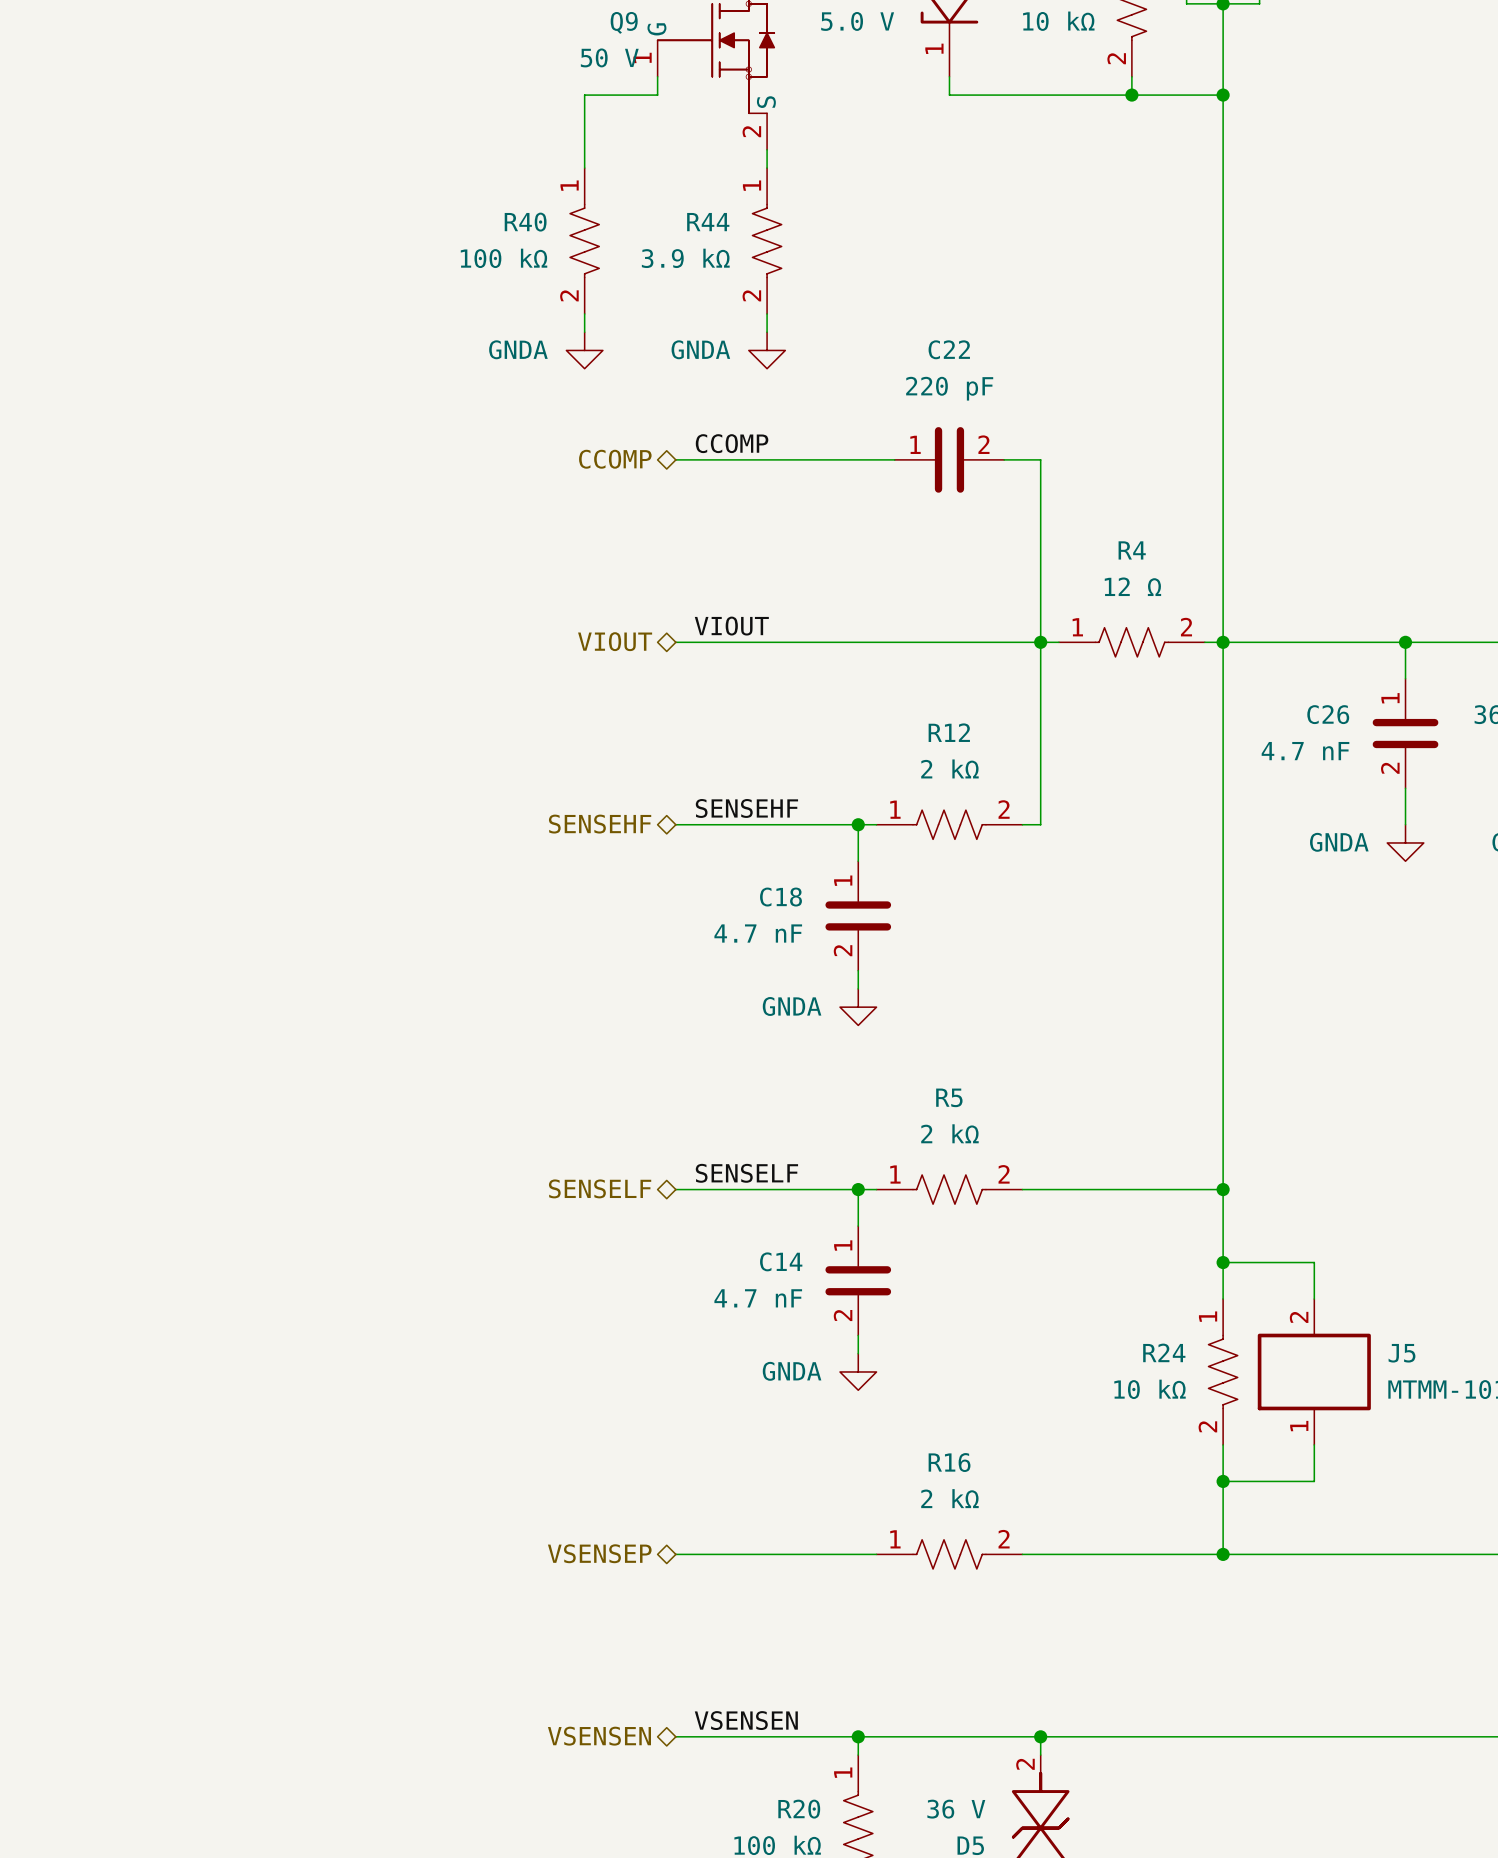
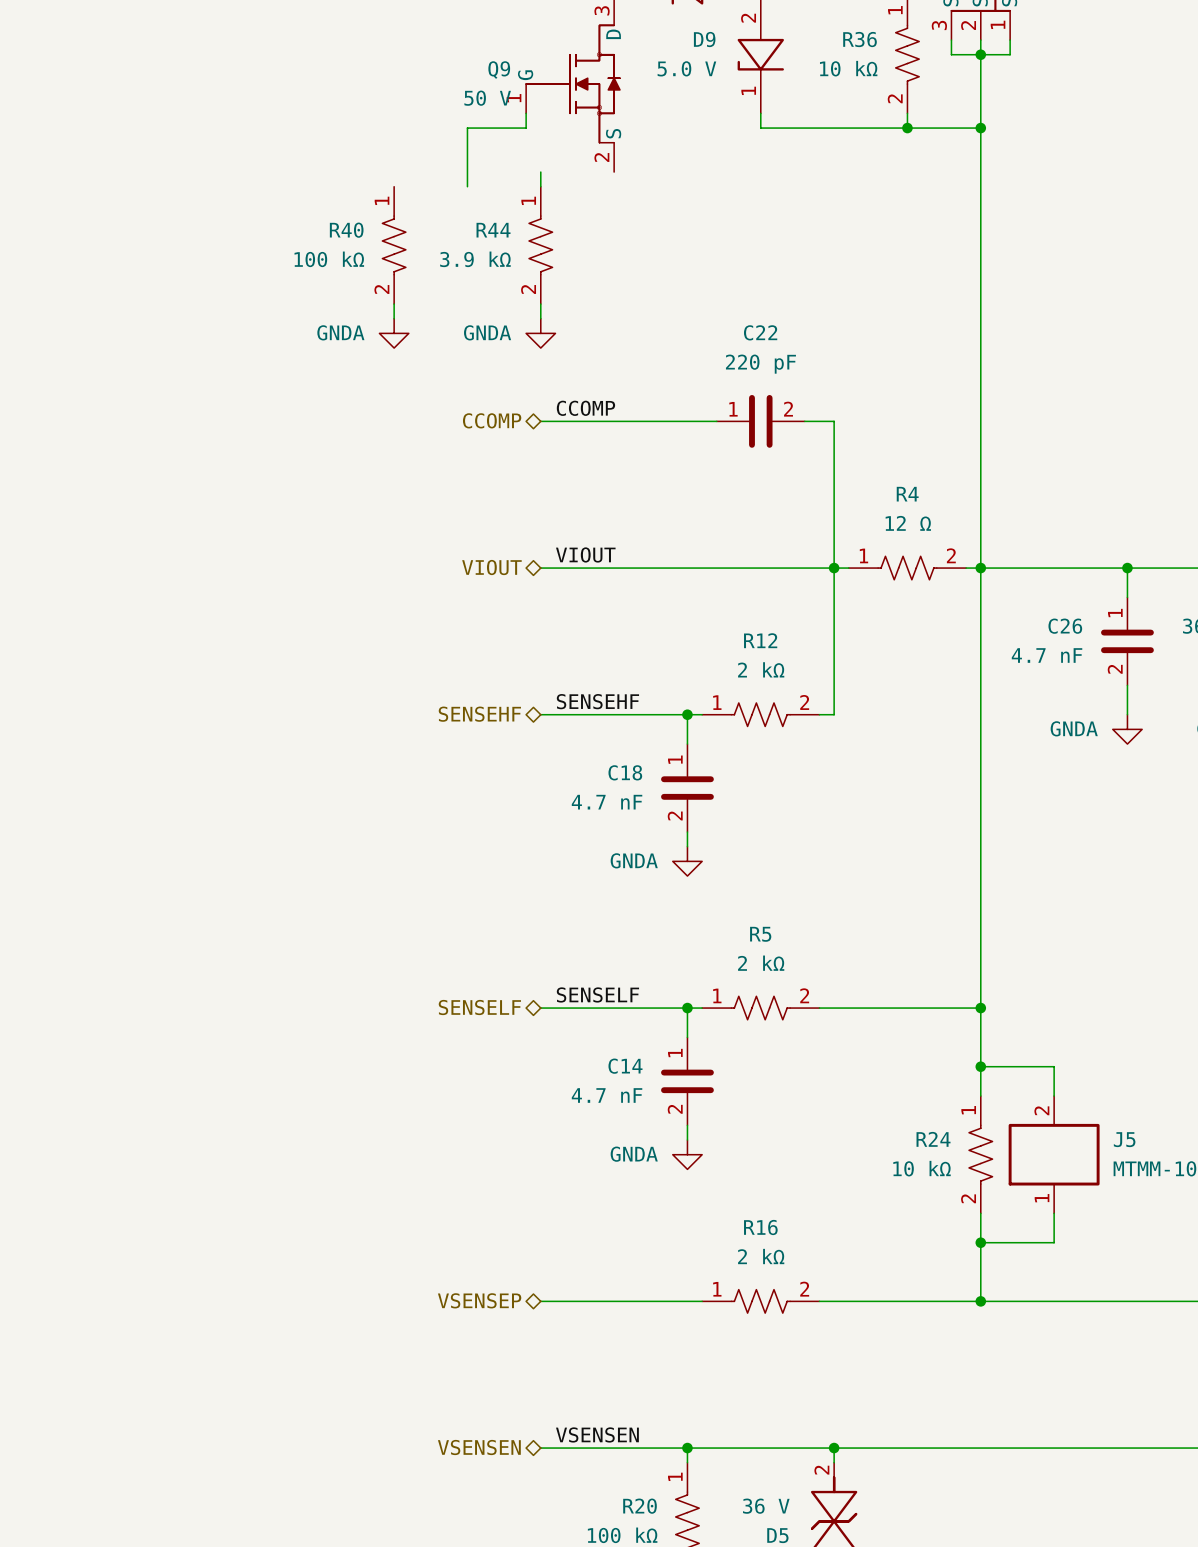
wire: (767, 149) (767, 168) -> (540, 172) (540, 186)
R40 position: (584, 241) -> (394, 245)
R44 position: (767, 241) -> (540, 245)
wire: (584, 313) (584, 332) -> (394, 304) (394, 318)
wire: (767, 313) (767, 332) -> (540, 304) (540, 318)
power symbol: none -> GNDA (394, 333)
power symbol: GNDA (584, 350) -> none
power symbol: none -> GNDA (540, 333)
power symbol: GNDA (767, 350) -> none

